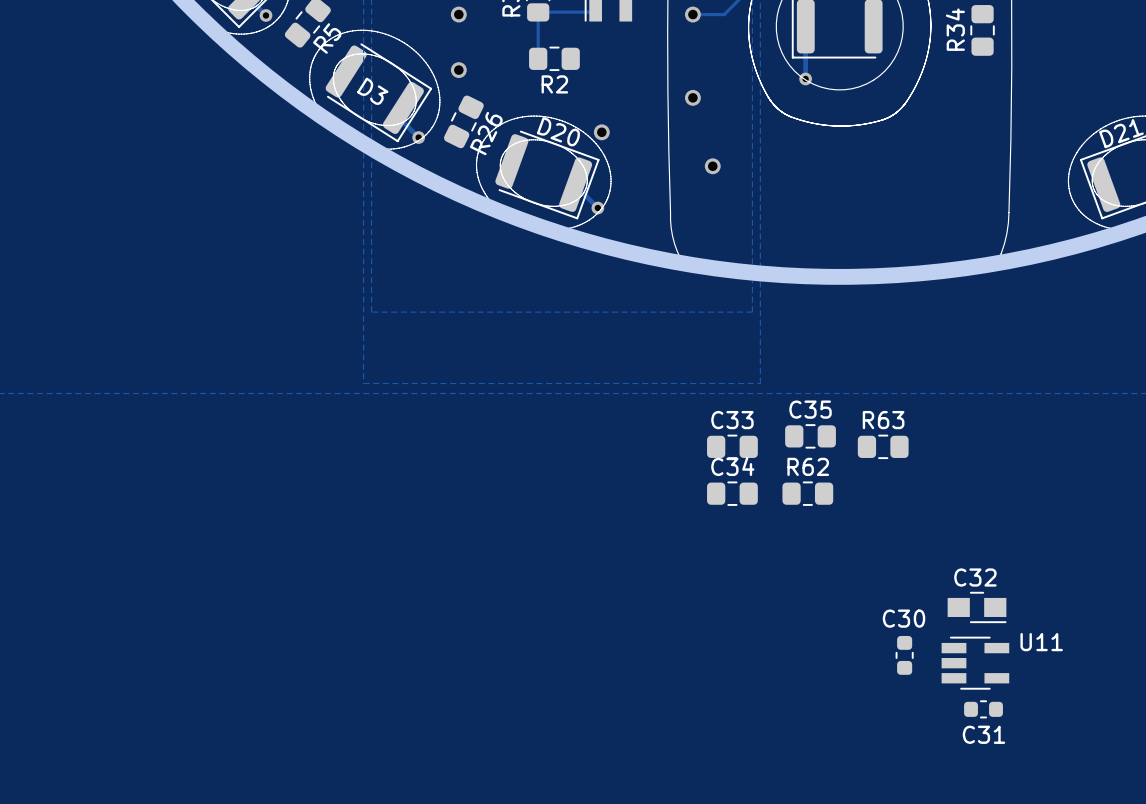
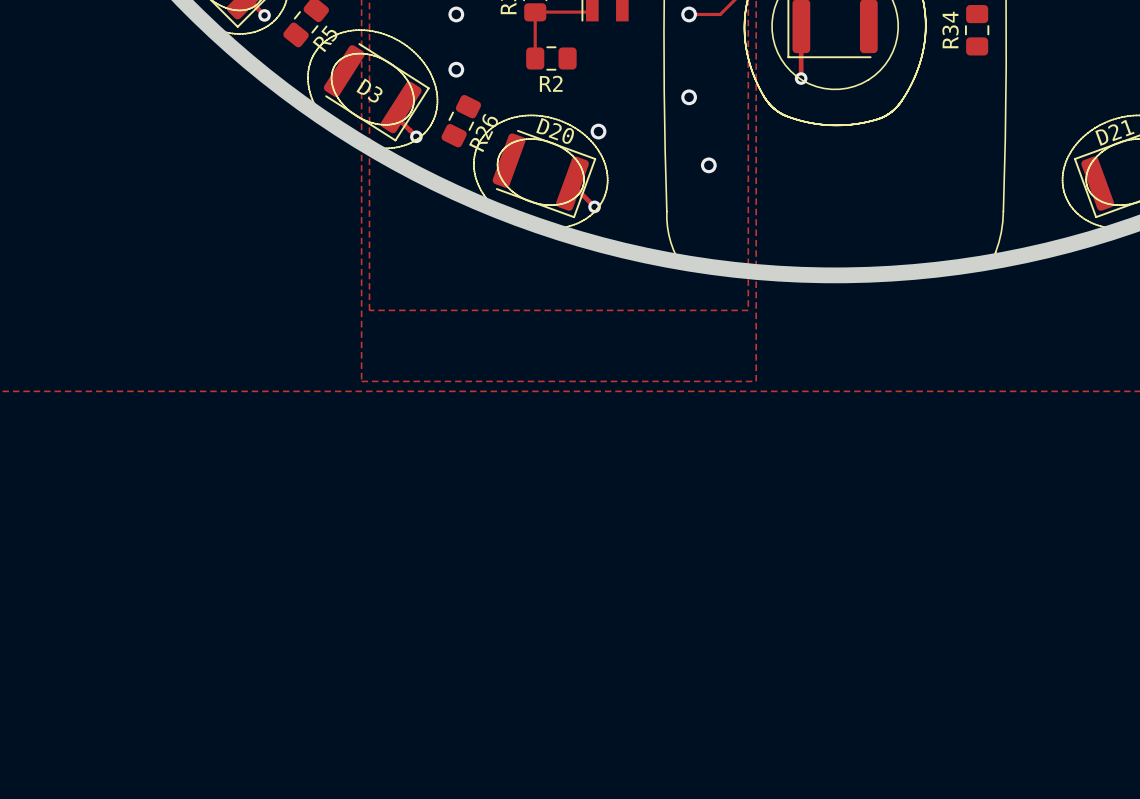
C35: (810, 436) -> none
C33: (732, 446) -> none
R63: (883, 446) -> none
C34: (732, 493) -> none
R62: (807, 493) -> none
C32: (977, 607) -> none
C30: (904, 655) -> none
U11: (975, 663) -> none
C31: (983, 709) -> none

